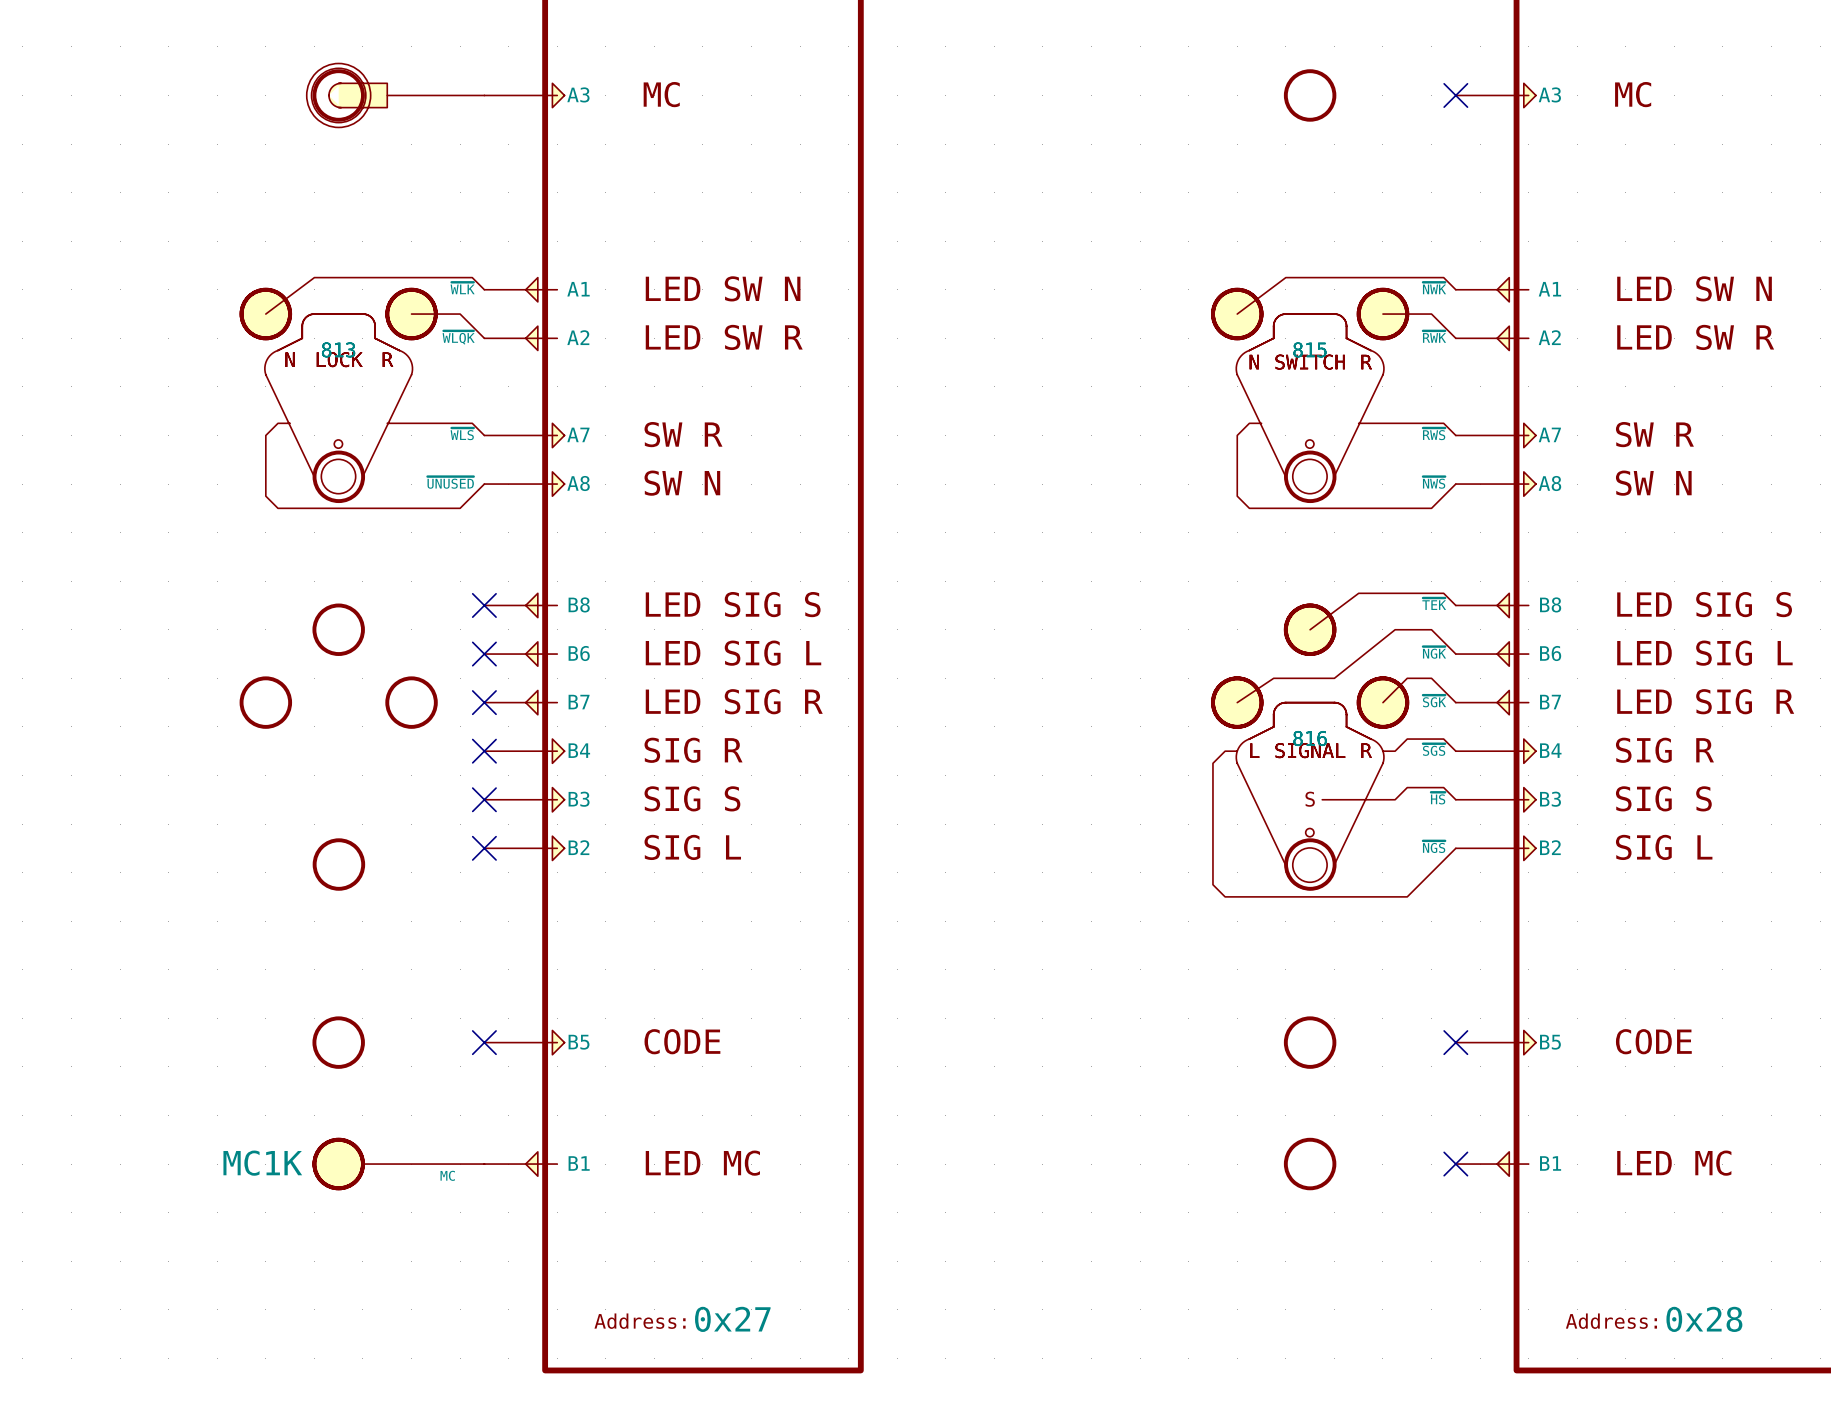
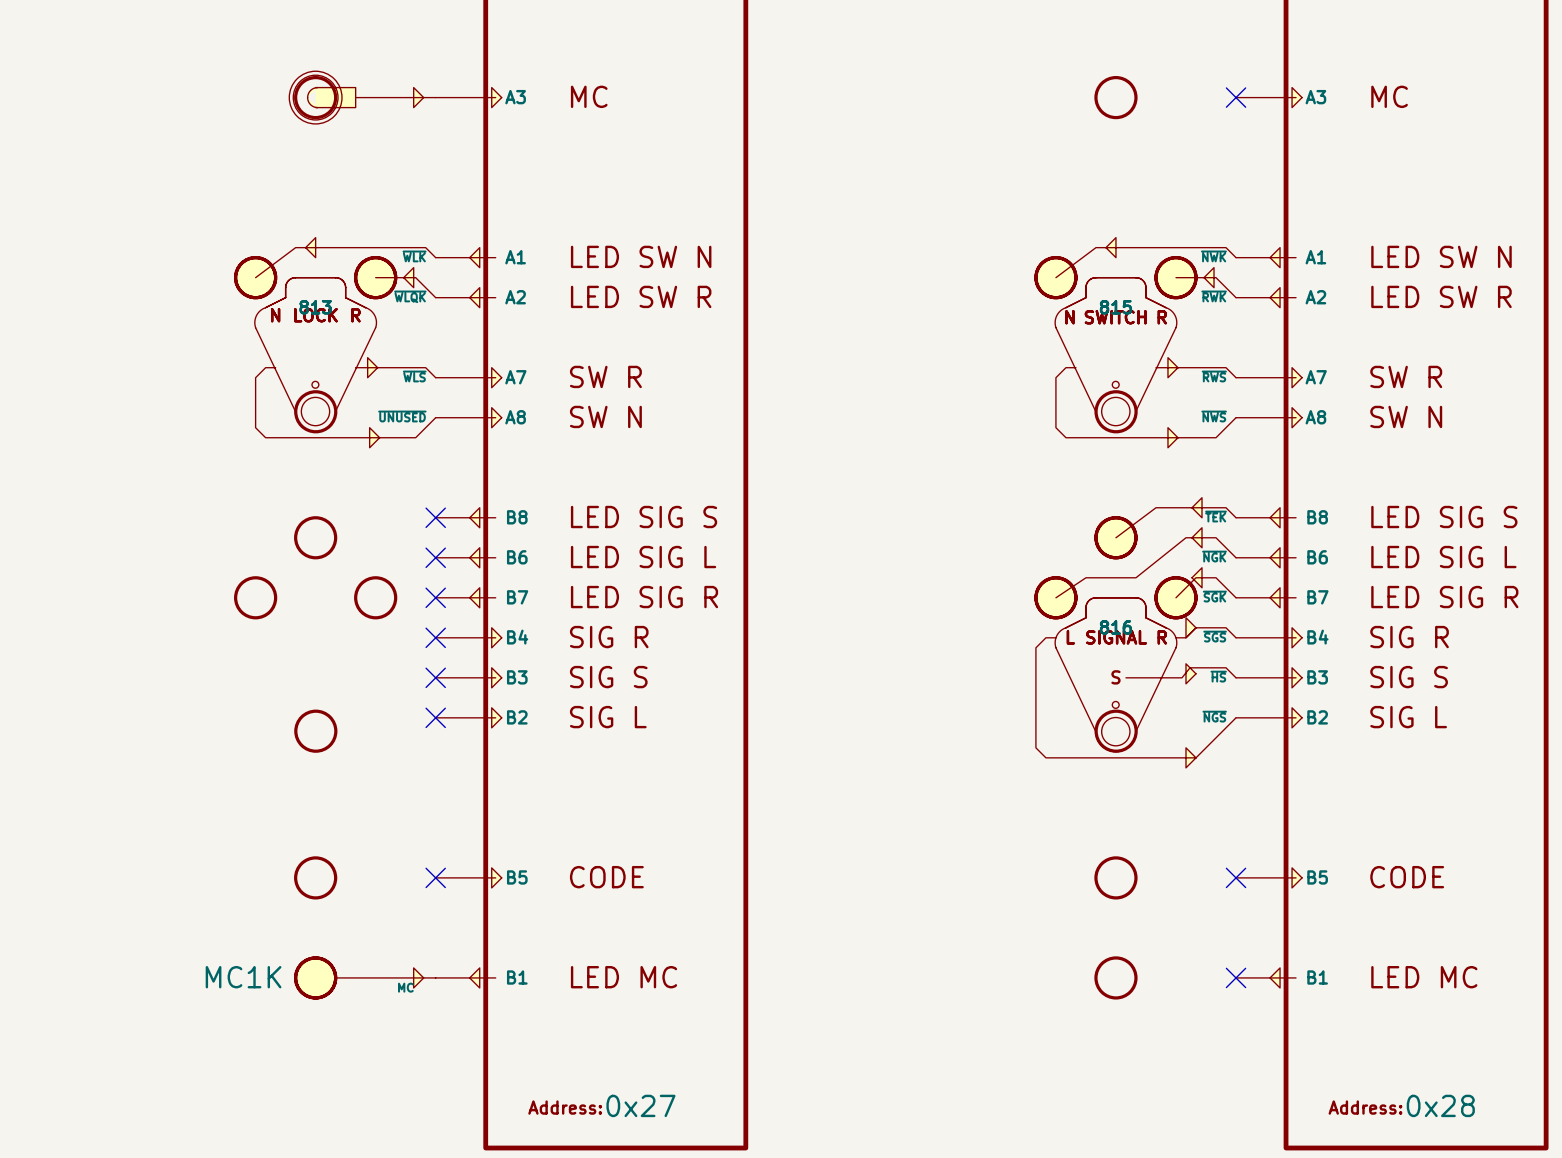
part symbol: [306, 63, 485, 128] -> [289, 71, 436, 124]
part symbol: [239, 277, 485, 351] -> [234, 237, 436, 308]
part symbol: [1211, 277, 1456, 351] -> [1034, 237, 1237, 308]
part symbol: [264, 314, 485, 509] -> [254, 277, 436, 448]
part symbol: [1236, 314, 1456, 509] -> [1055, 277, 1237, 448]
part symbol: [1211, 593, 1456, 740] -> [1034, 497, 1237, 628]
part symbol: [1212, 702, 1456, 897] -> [1035, 597, 1237, 768]
part symbol: [312, 1137, 485, 1191] -> [294, 956, 436, 1000]

